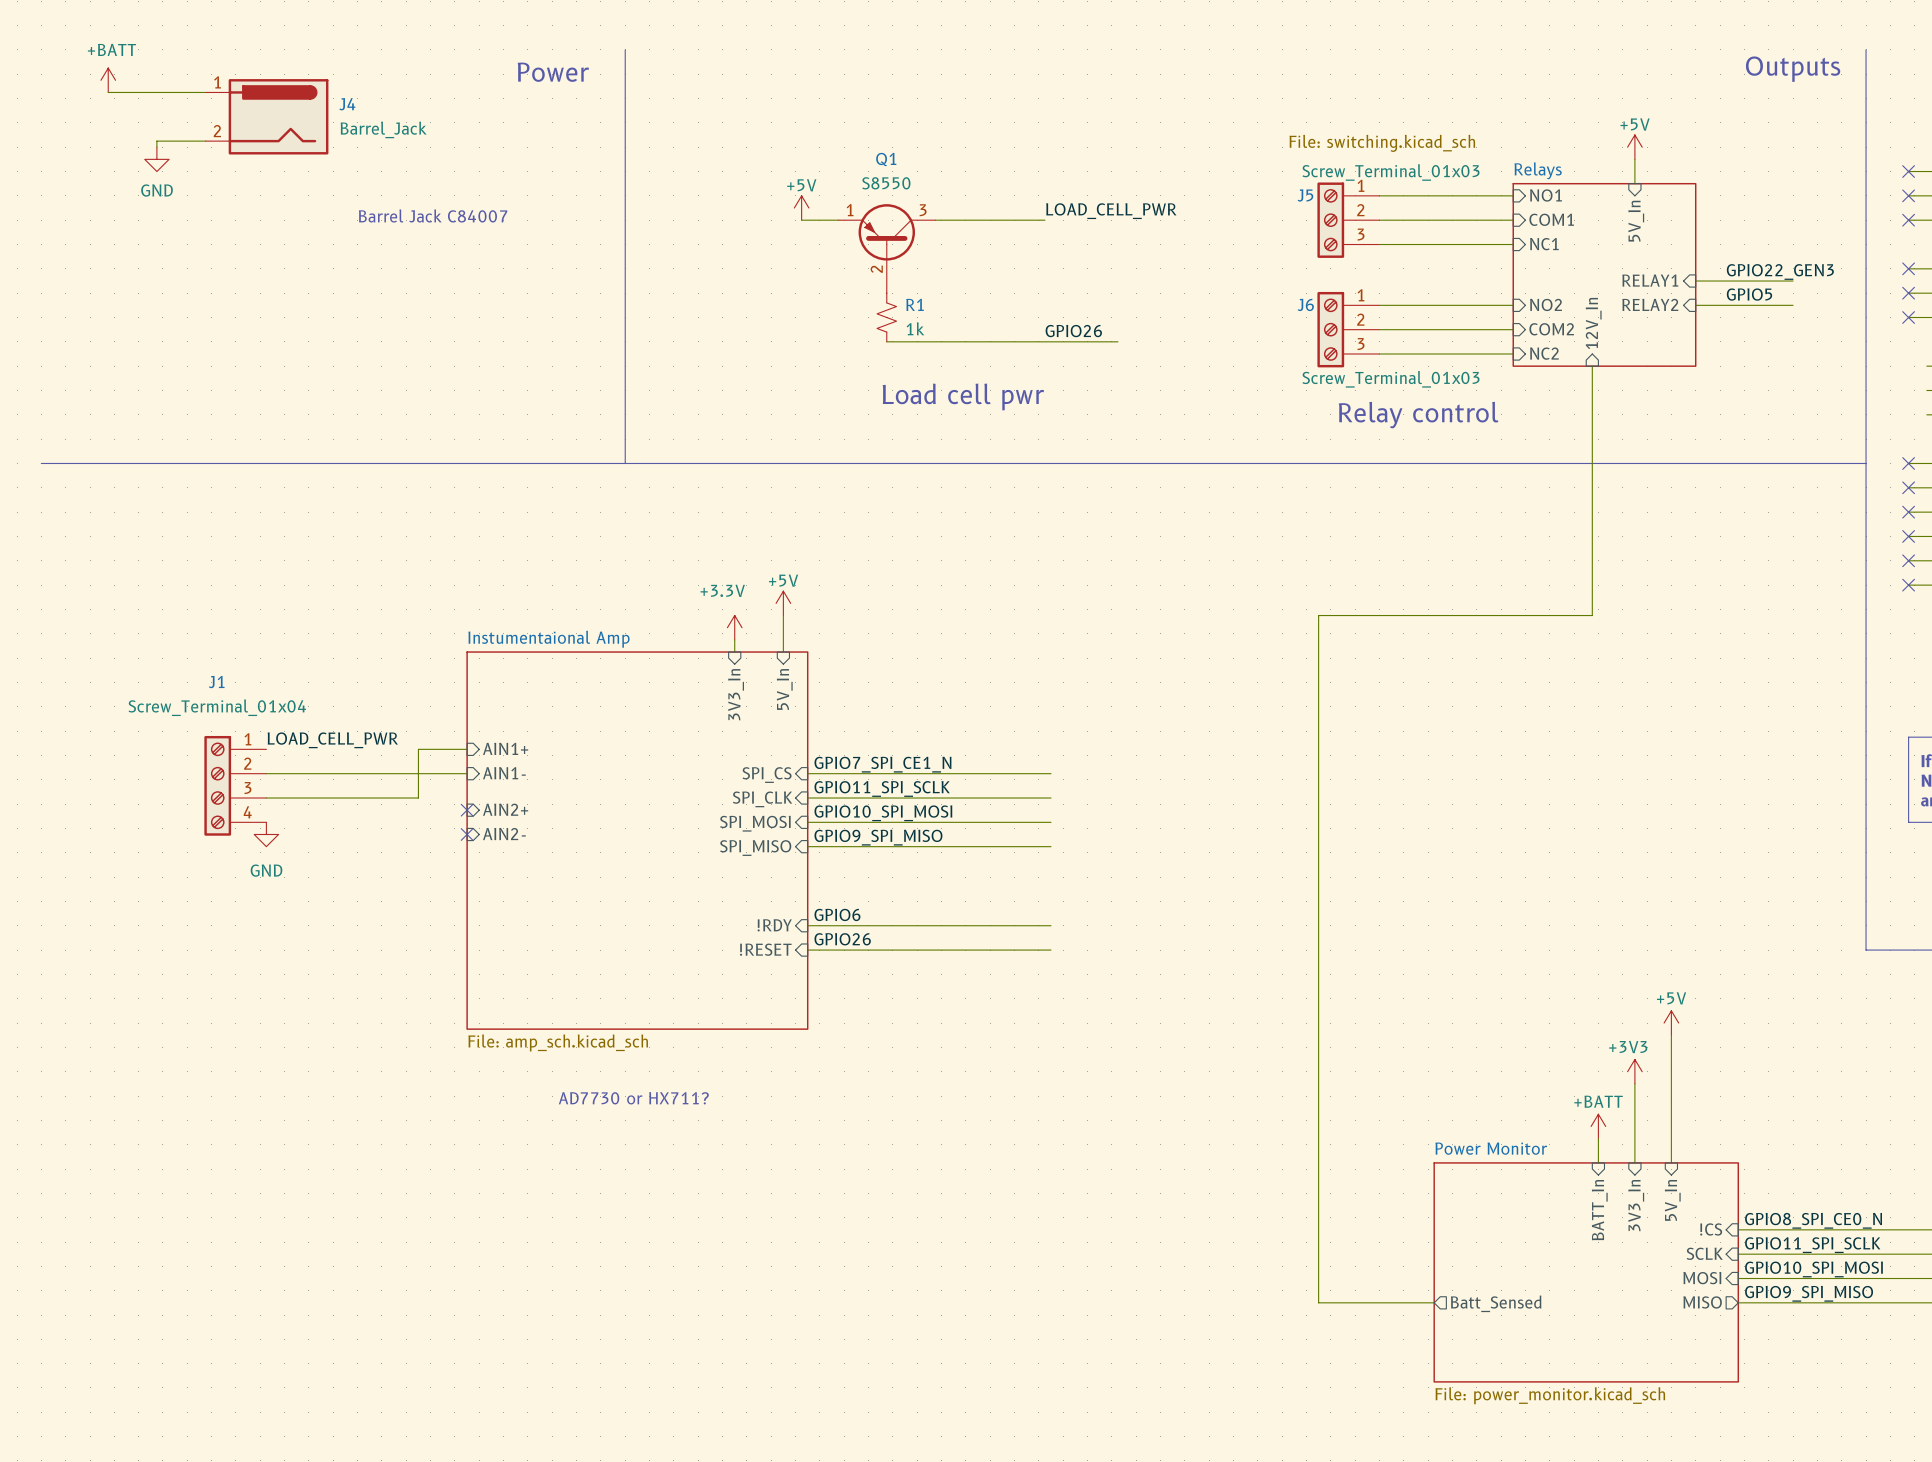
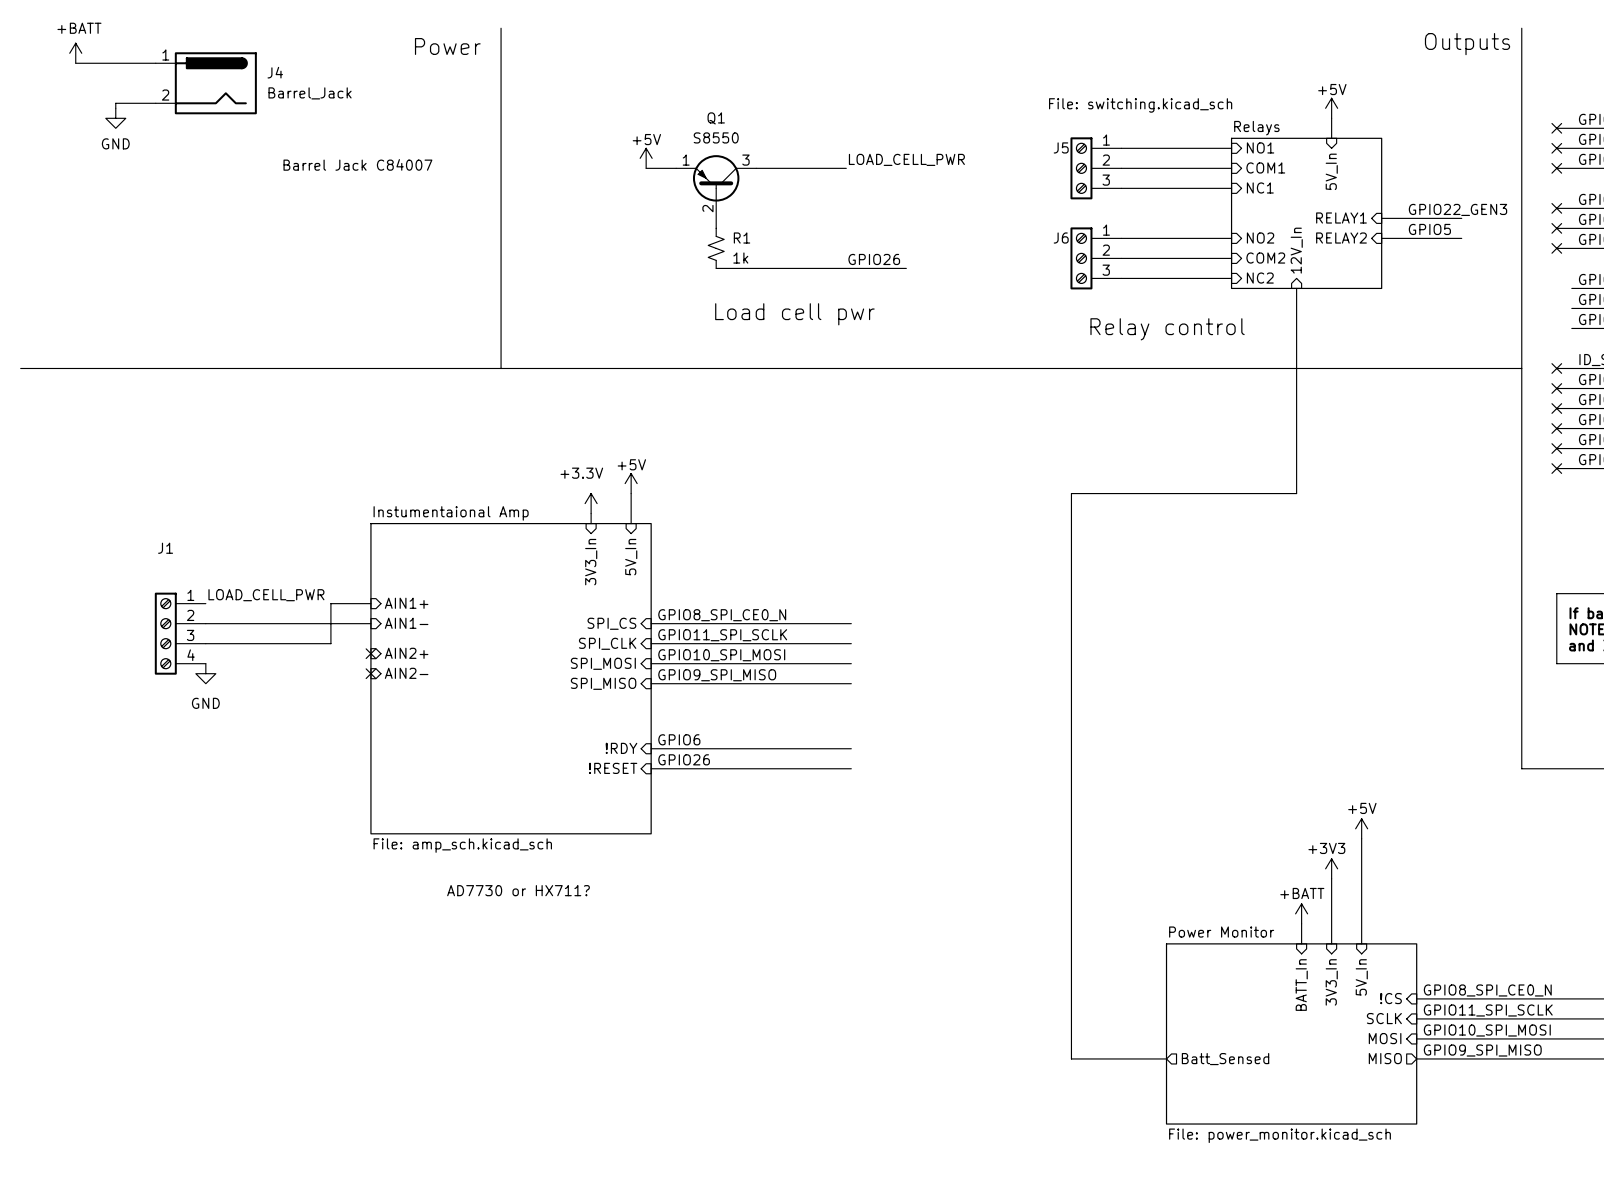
J5 value: Screw_Terminal_01x03 (1390, 172) -> none
J6 value: Screw_Terminal_01x03 (1390, 379) -> none
J1 value: Screw_Terminal_01x04 (217, 707) -> none
label: GPIO7_SPI_CE1_N (882, 764) -> GPIO8_SPI_CE0_N (722, 615)

